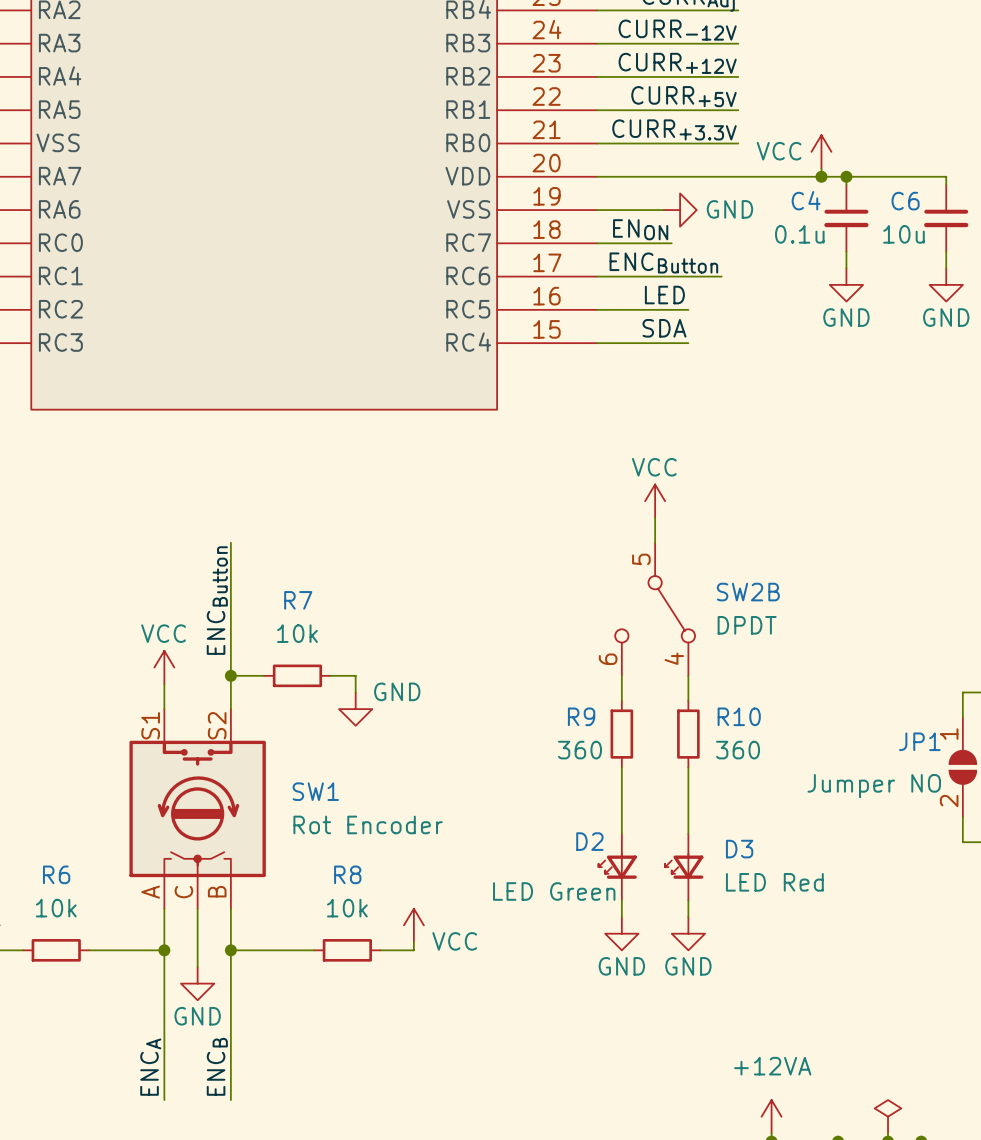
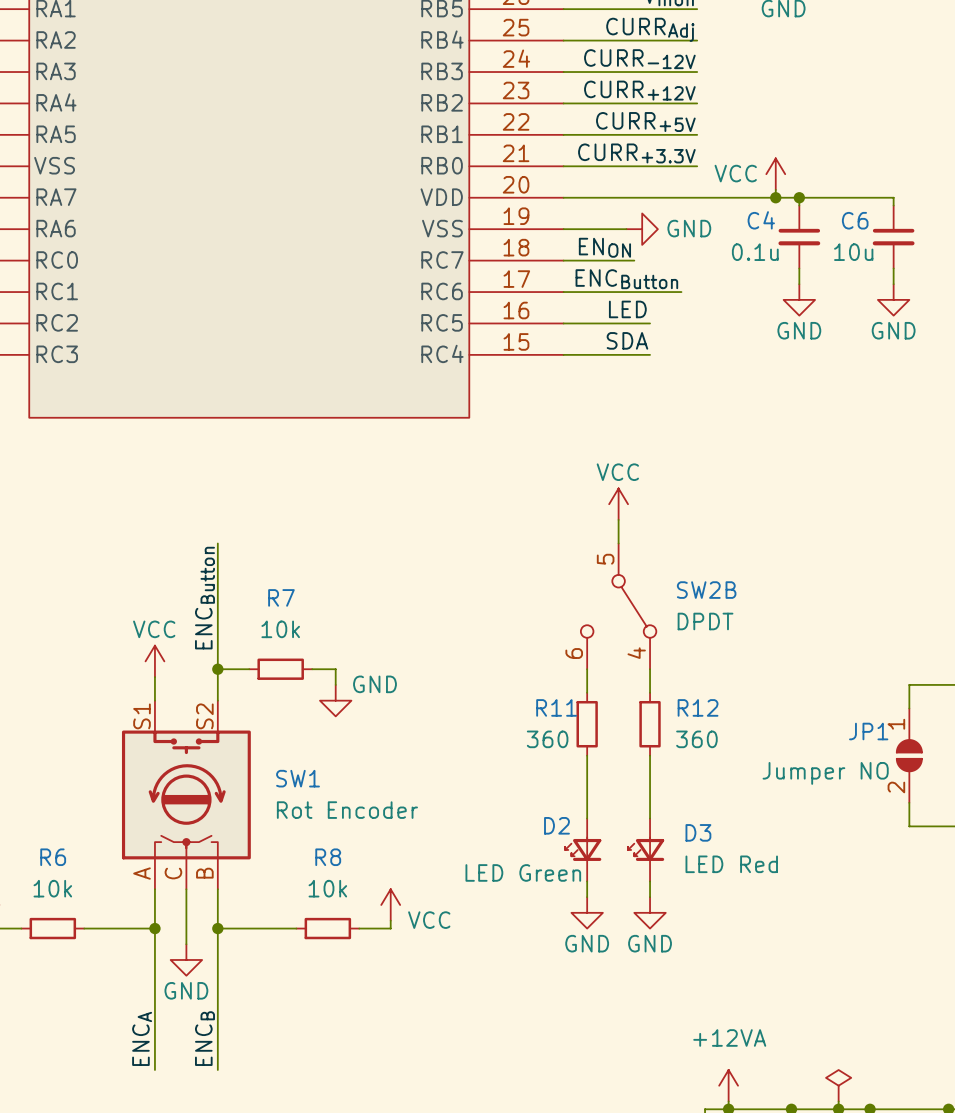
R9 name: R9 (581, 716) -> R11 (556, 707)
R10 name: R10 (739, 716) -> R12 (698, 707)

